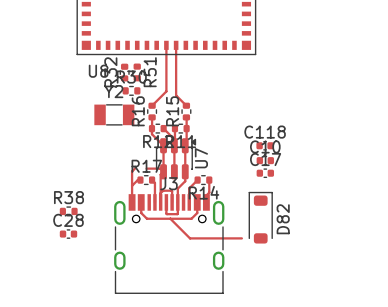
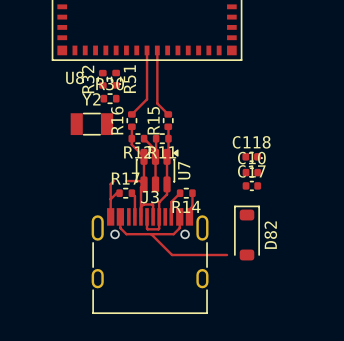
R38: (68, 211) -> none
C28: (68, 234) -> none

